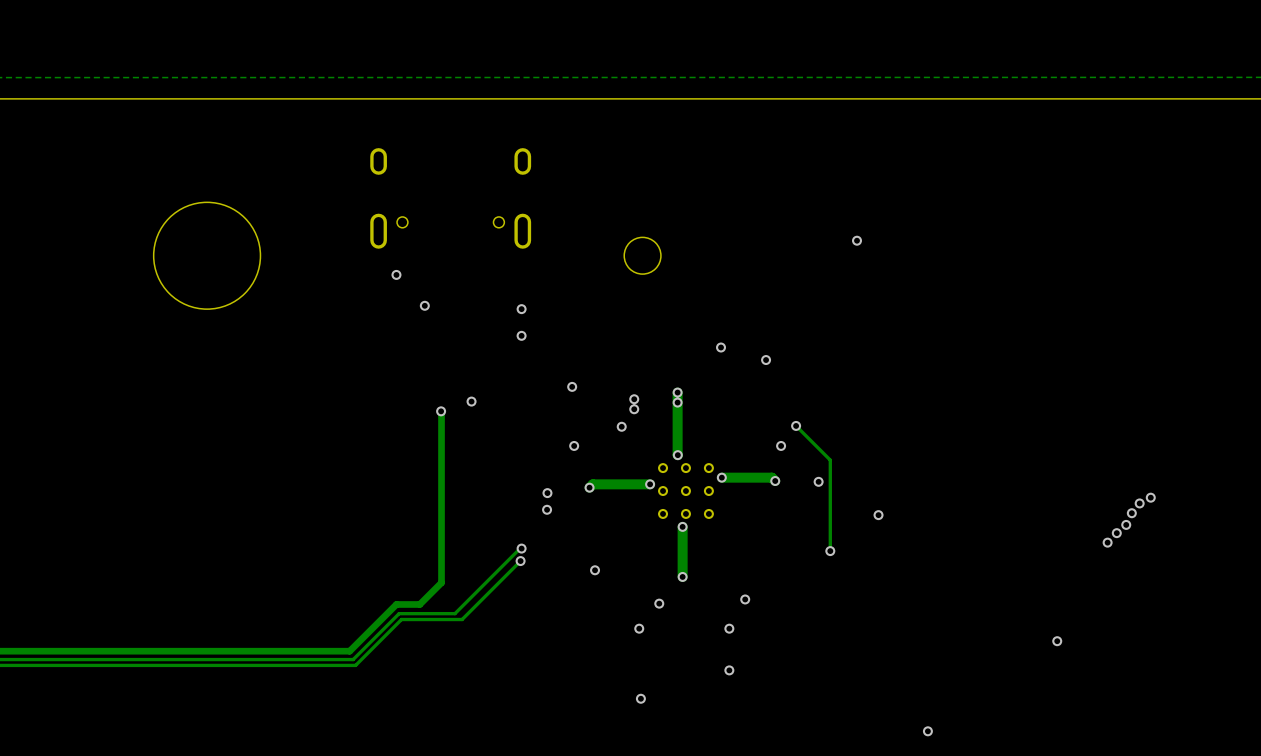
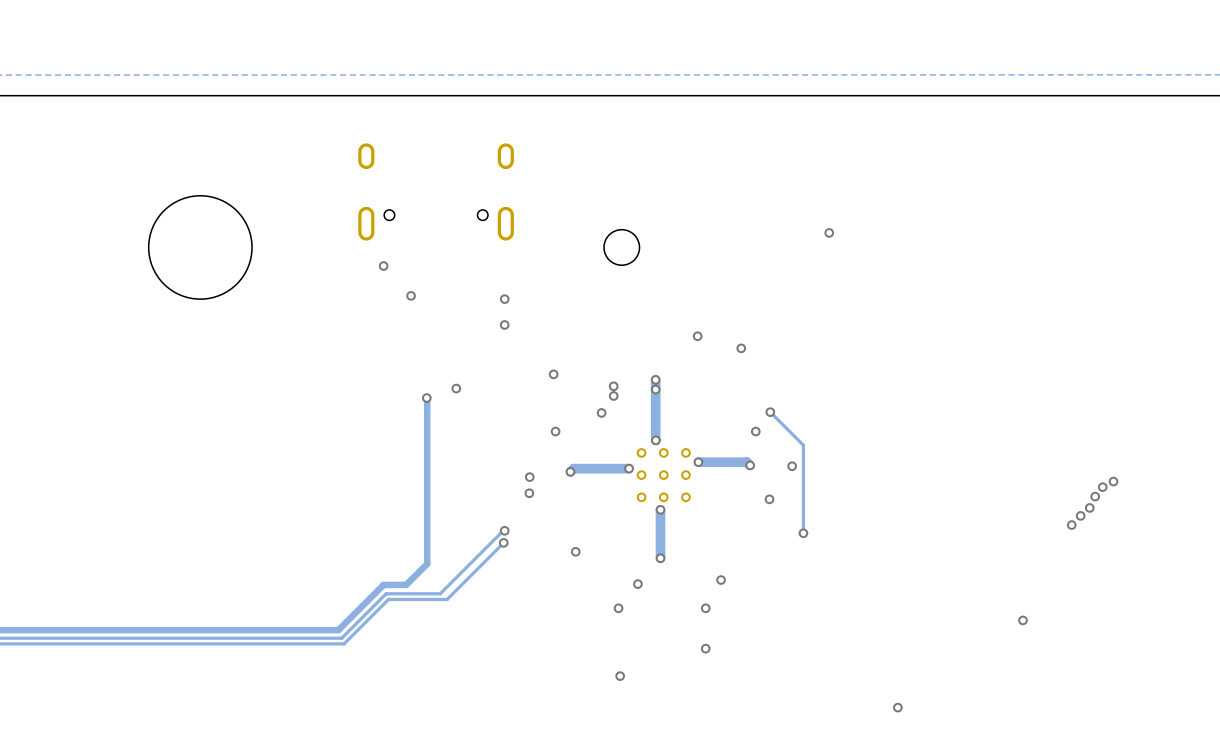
via position: (878, 515) -> (769, 499)

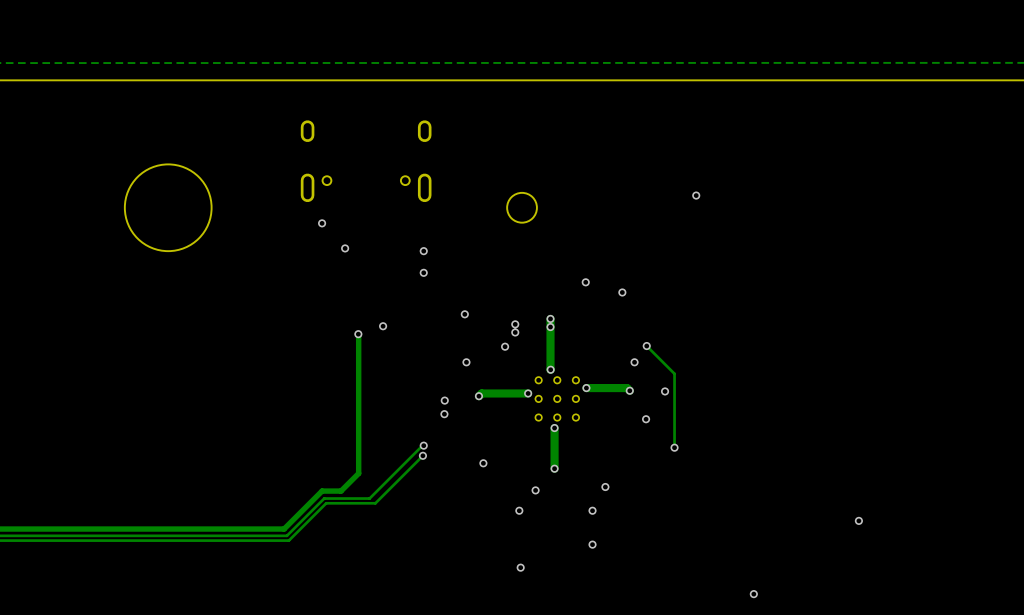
via: (1113, 481) -> none
via: (1102, 487) -> none
via: (1095, 496) -> none
via: (1089, 507) -> none
via: (1080, 515) -> none
via: (1071, 525) -> none

